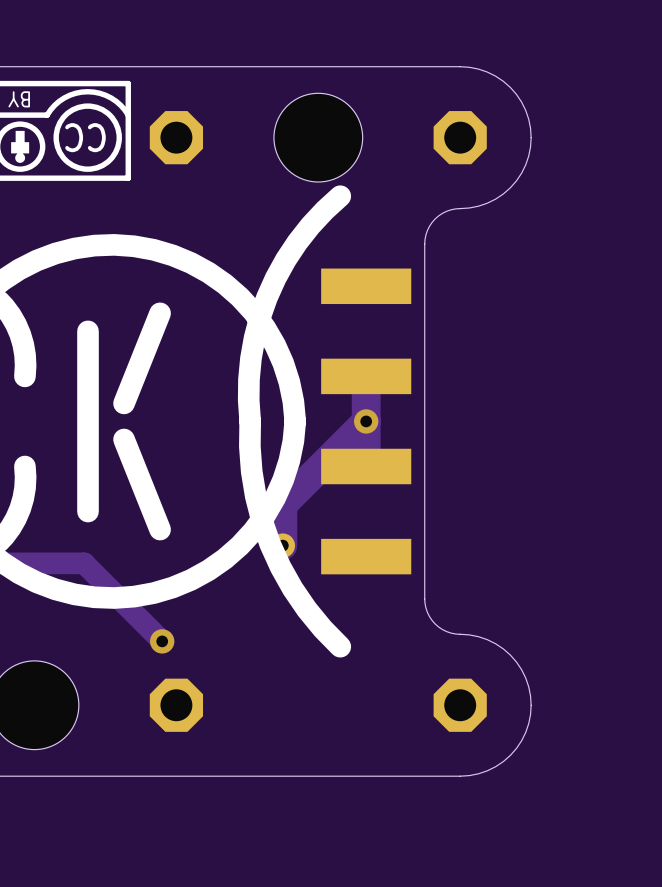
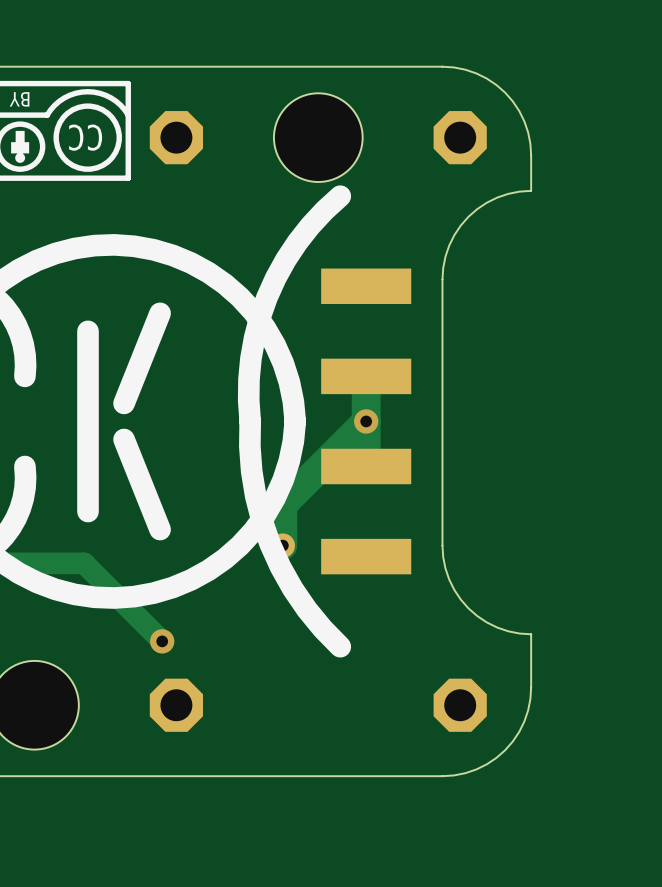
board edge: (442, 66) (478, 69) (503, 81) (516, 94) (525, 110) (531, 137) (525, 164) (510, 187) (487, 203) (469, 207) (451, 209) (442, 213) (432, 222) (425, 239) (425, 608) (432, 620) (442, 629) (451, 633) (469, 634) (487, 639) (510, 655) (525, 678) (531, 705) (525, 732) (516, 748) (503, 761) (478, 773) (442, 776) -> (442, 66) (454, 67) (476, 73) (486, 78) (505, 92) (519, 111) (524, 121) (530, 143) (531, 155) (531, 190) (519, 191) (497, 197) (486, 202) (468, 216) (454, 235) (449, 245) (443, 267) (442, 279) (442, 545) (445, 568) (454, 589) (468, 608) (477, 615) (497, 627) (519, 633) (531, 634) (530, 699) (524, 721) (519, 731) (505, 750) (486, 764) (476, 769) (454, 775) (442, 776)

